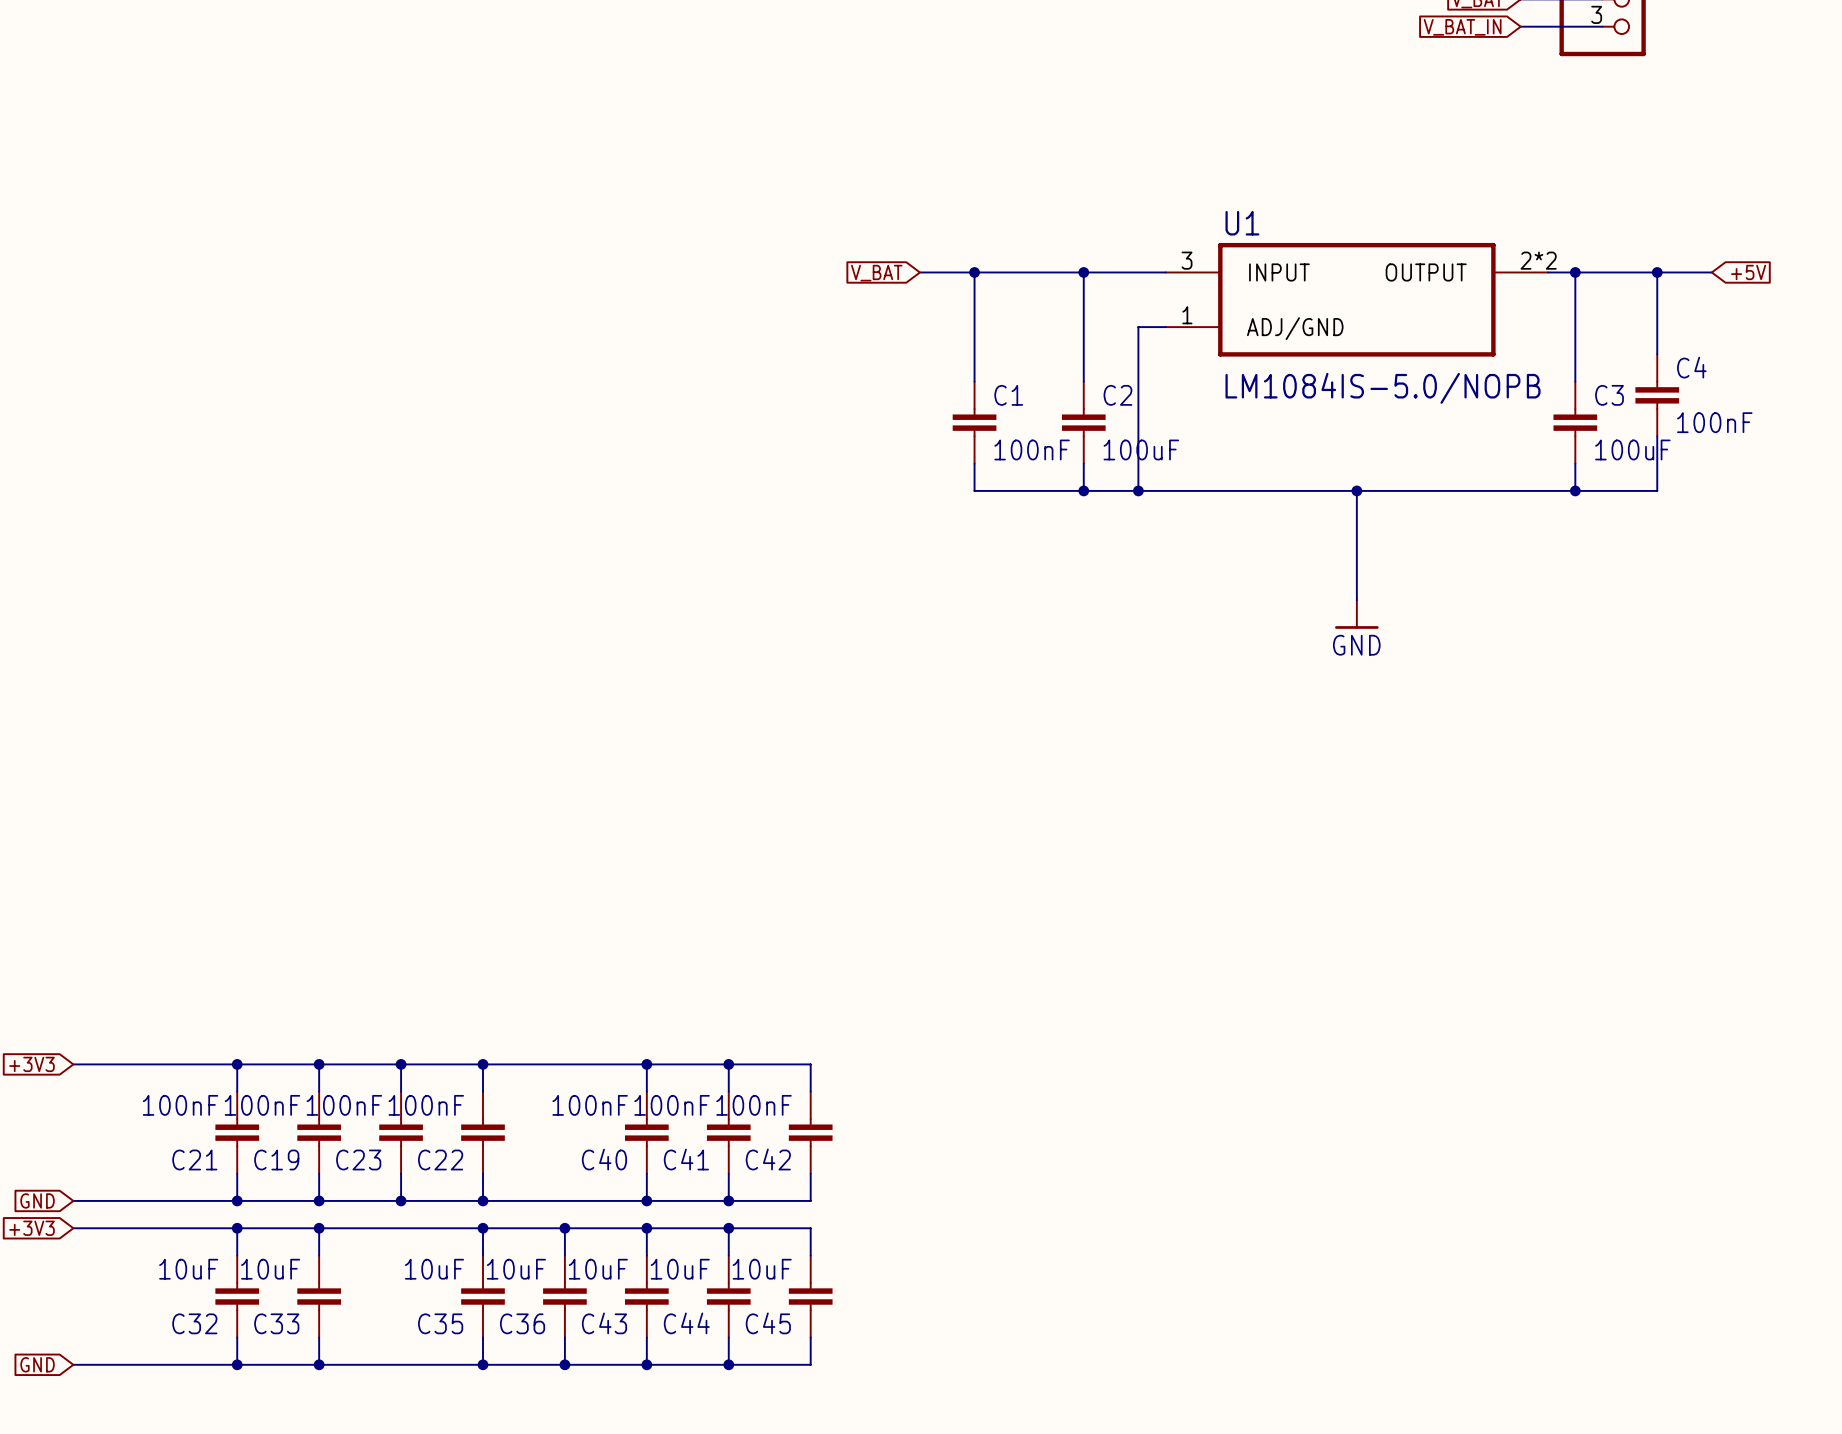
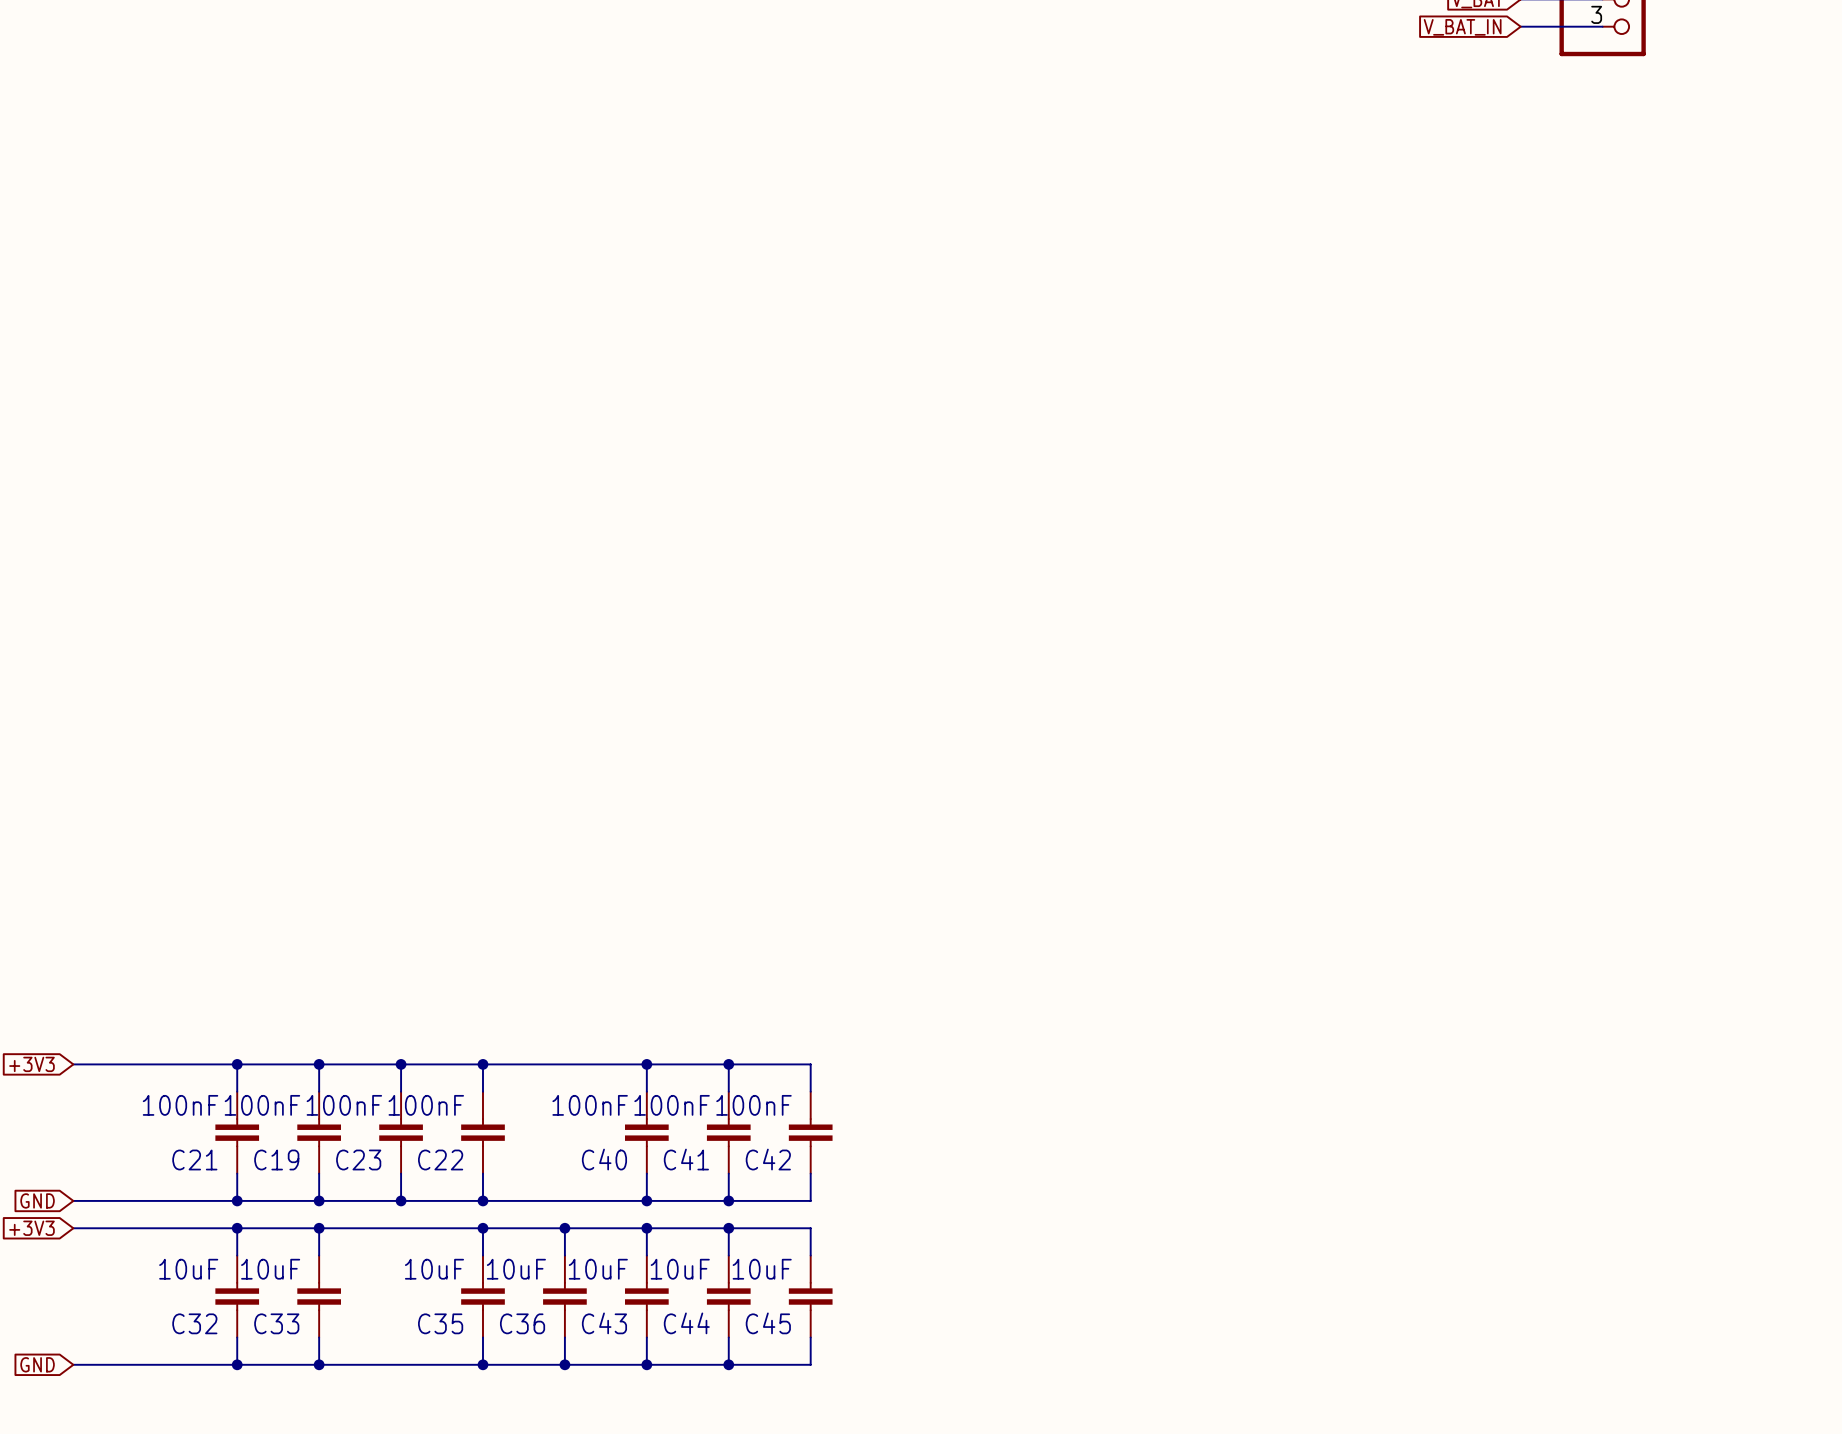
wire: (919, 272) (1165, 272) -> none
wire: (974, 272) (974, 381) -> none
junction: (974, 272) -> none
wire: (1083, 272) (1083, 381) -> none
junction: (1083, 272) -> none
wire: (1548, 272) (1711, 272) -> none
wire: (1575, 272) (1575, 381) -> none
junction: (1575, 272) -> none
wire: (1657, 272) (1657, 354) -> none
junction: (1657, 272) -> none
global label: +5V (1748, 272) -> none
global label: V_BAT (876, 273) -> none
U1: LM1084IS-5.0/NOPB (1356, 299) -> none
wire: (1165, 327) (1138, 327) (1138, 490) -> none
C4: 100nF (1657, 395) -> none
C1: 100nF (974, 422) -> none
C2: 100uF (1083, 422) -> none
C3: 100uF (1575, 422) -> none
wire: (1657, 436) (1657, 490) (974, 490) (974, 463) -> none
wire: (1083, 463) (1083, 490) -> none
wire: (1575, 463) (1575, 490) -> none
junction: (1083, 490) -> none
junction: (1138, 490) -> none
wire: (1356, 490) (1356, 600) -> none
junction: (1356, 490) -> none
junction: (1575, 490) -> none
power symbol: GND (1356, 614) -> none

